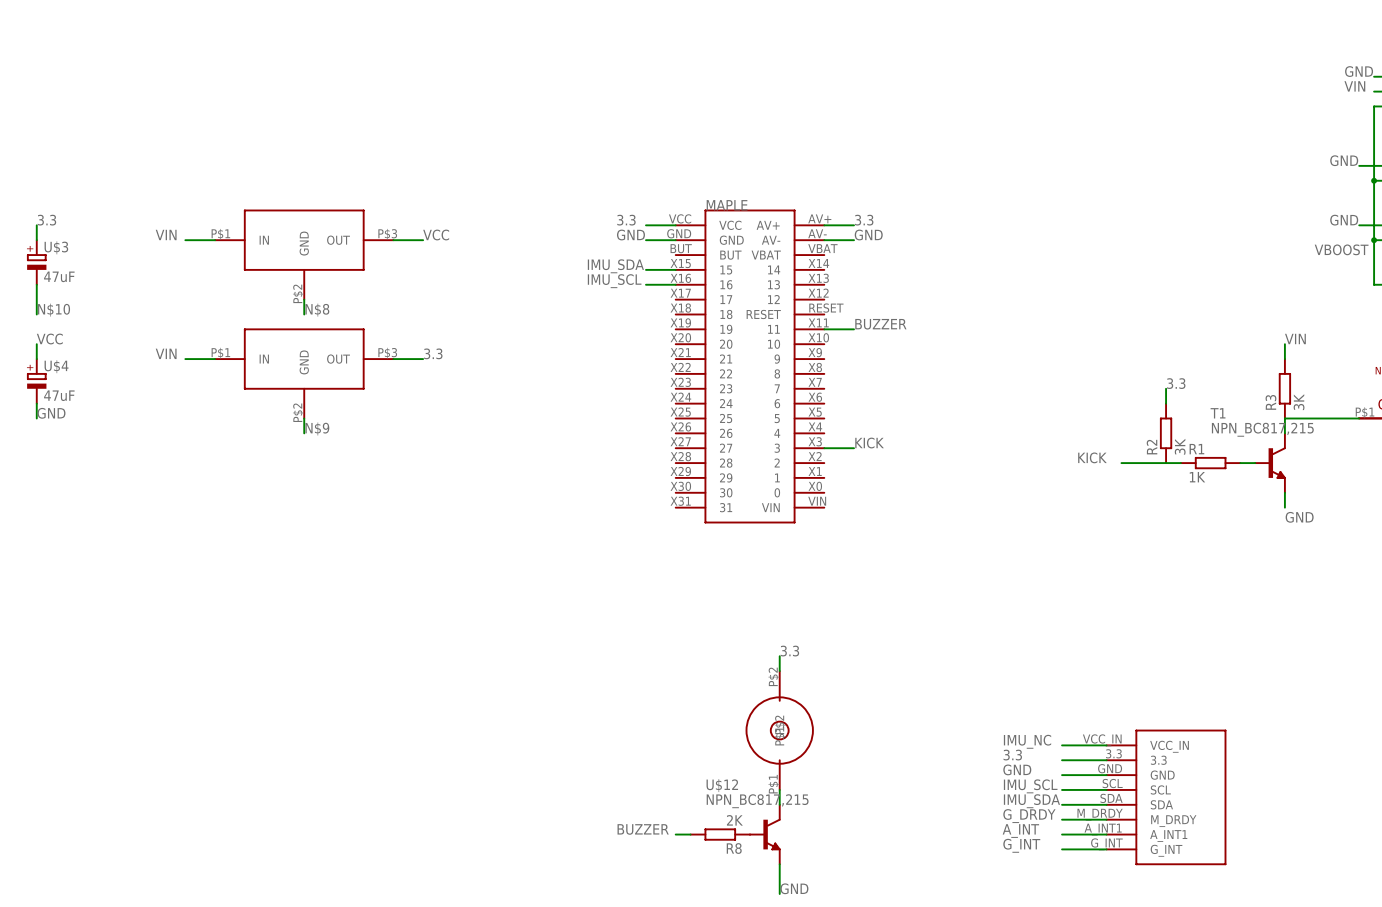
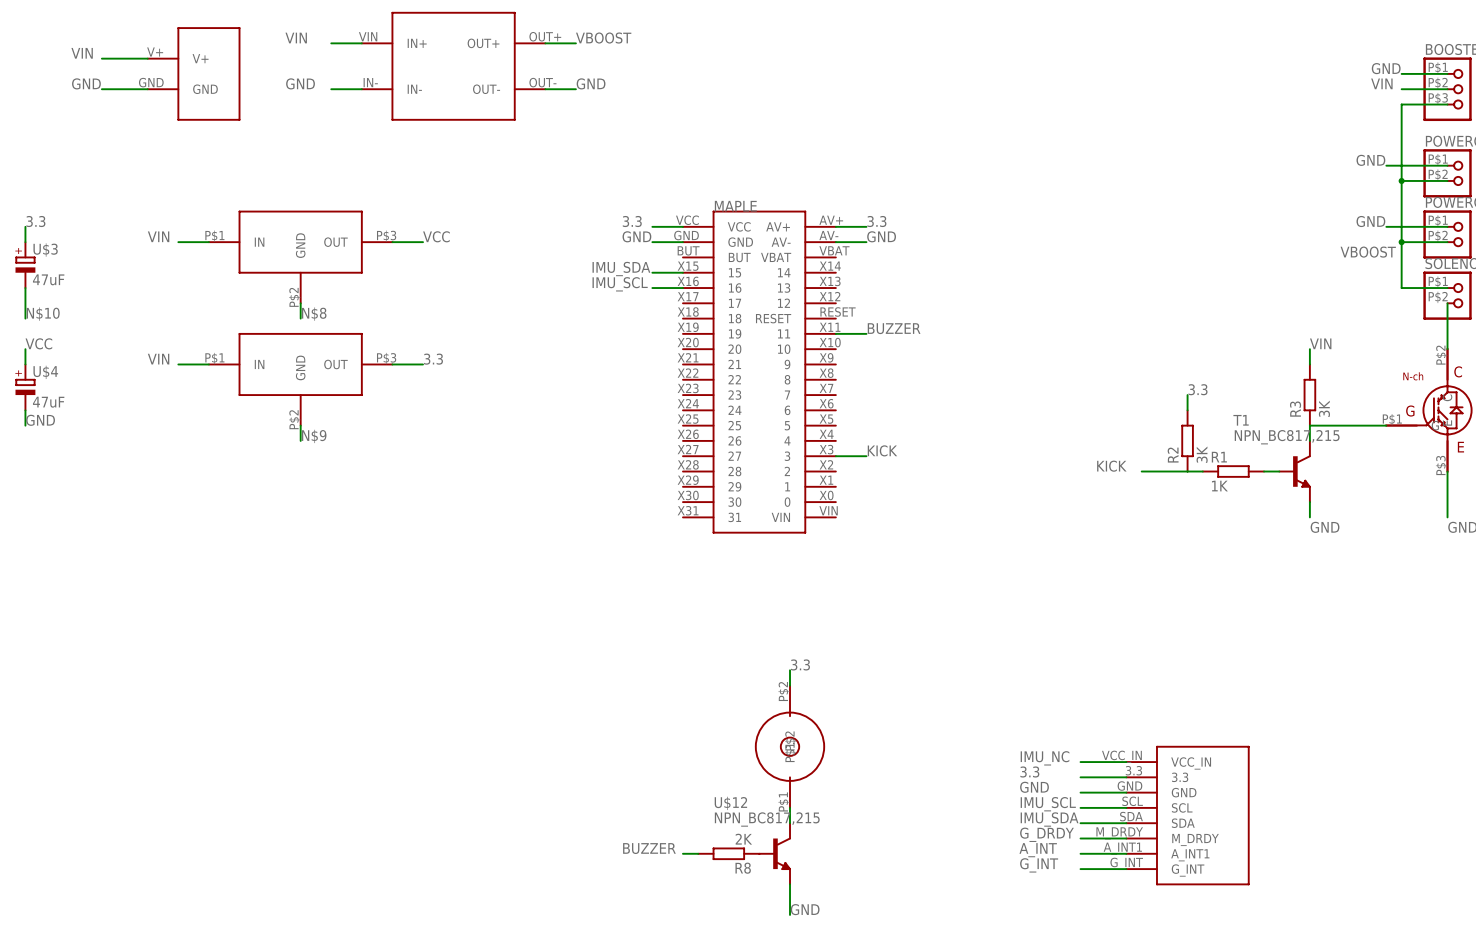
label: none -> VIN (296, 38)
label: none -> VBOOST (603, 38)
wire: none -> (331, 43) (361, 43)
wire: none -> (545, 43) (575, 43)
label: none -> VIN (82, 53)
wire: none -> (101, 58) (147, 58)
part: none -> (453, 66)
part: none -> (194, 73)
label: none -> GND (86, 83)
label: none -> GND (300, 83)
label: none -> GND (591, 83)
wire: none -> (101, 89) (147, 89)
wire: none -> (331, 89) (361, 89)
wire: none -> (545, 89) (575, 89)

